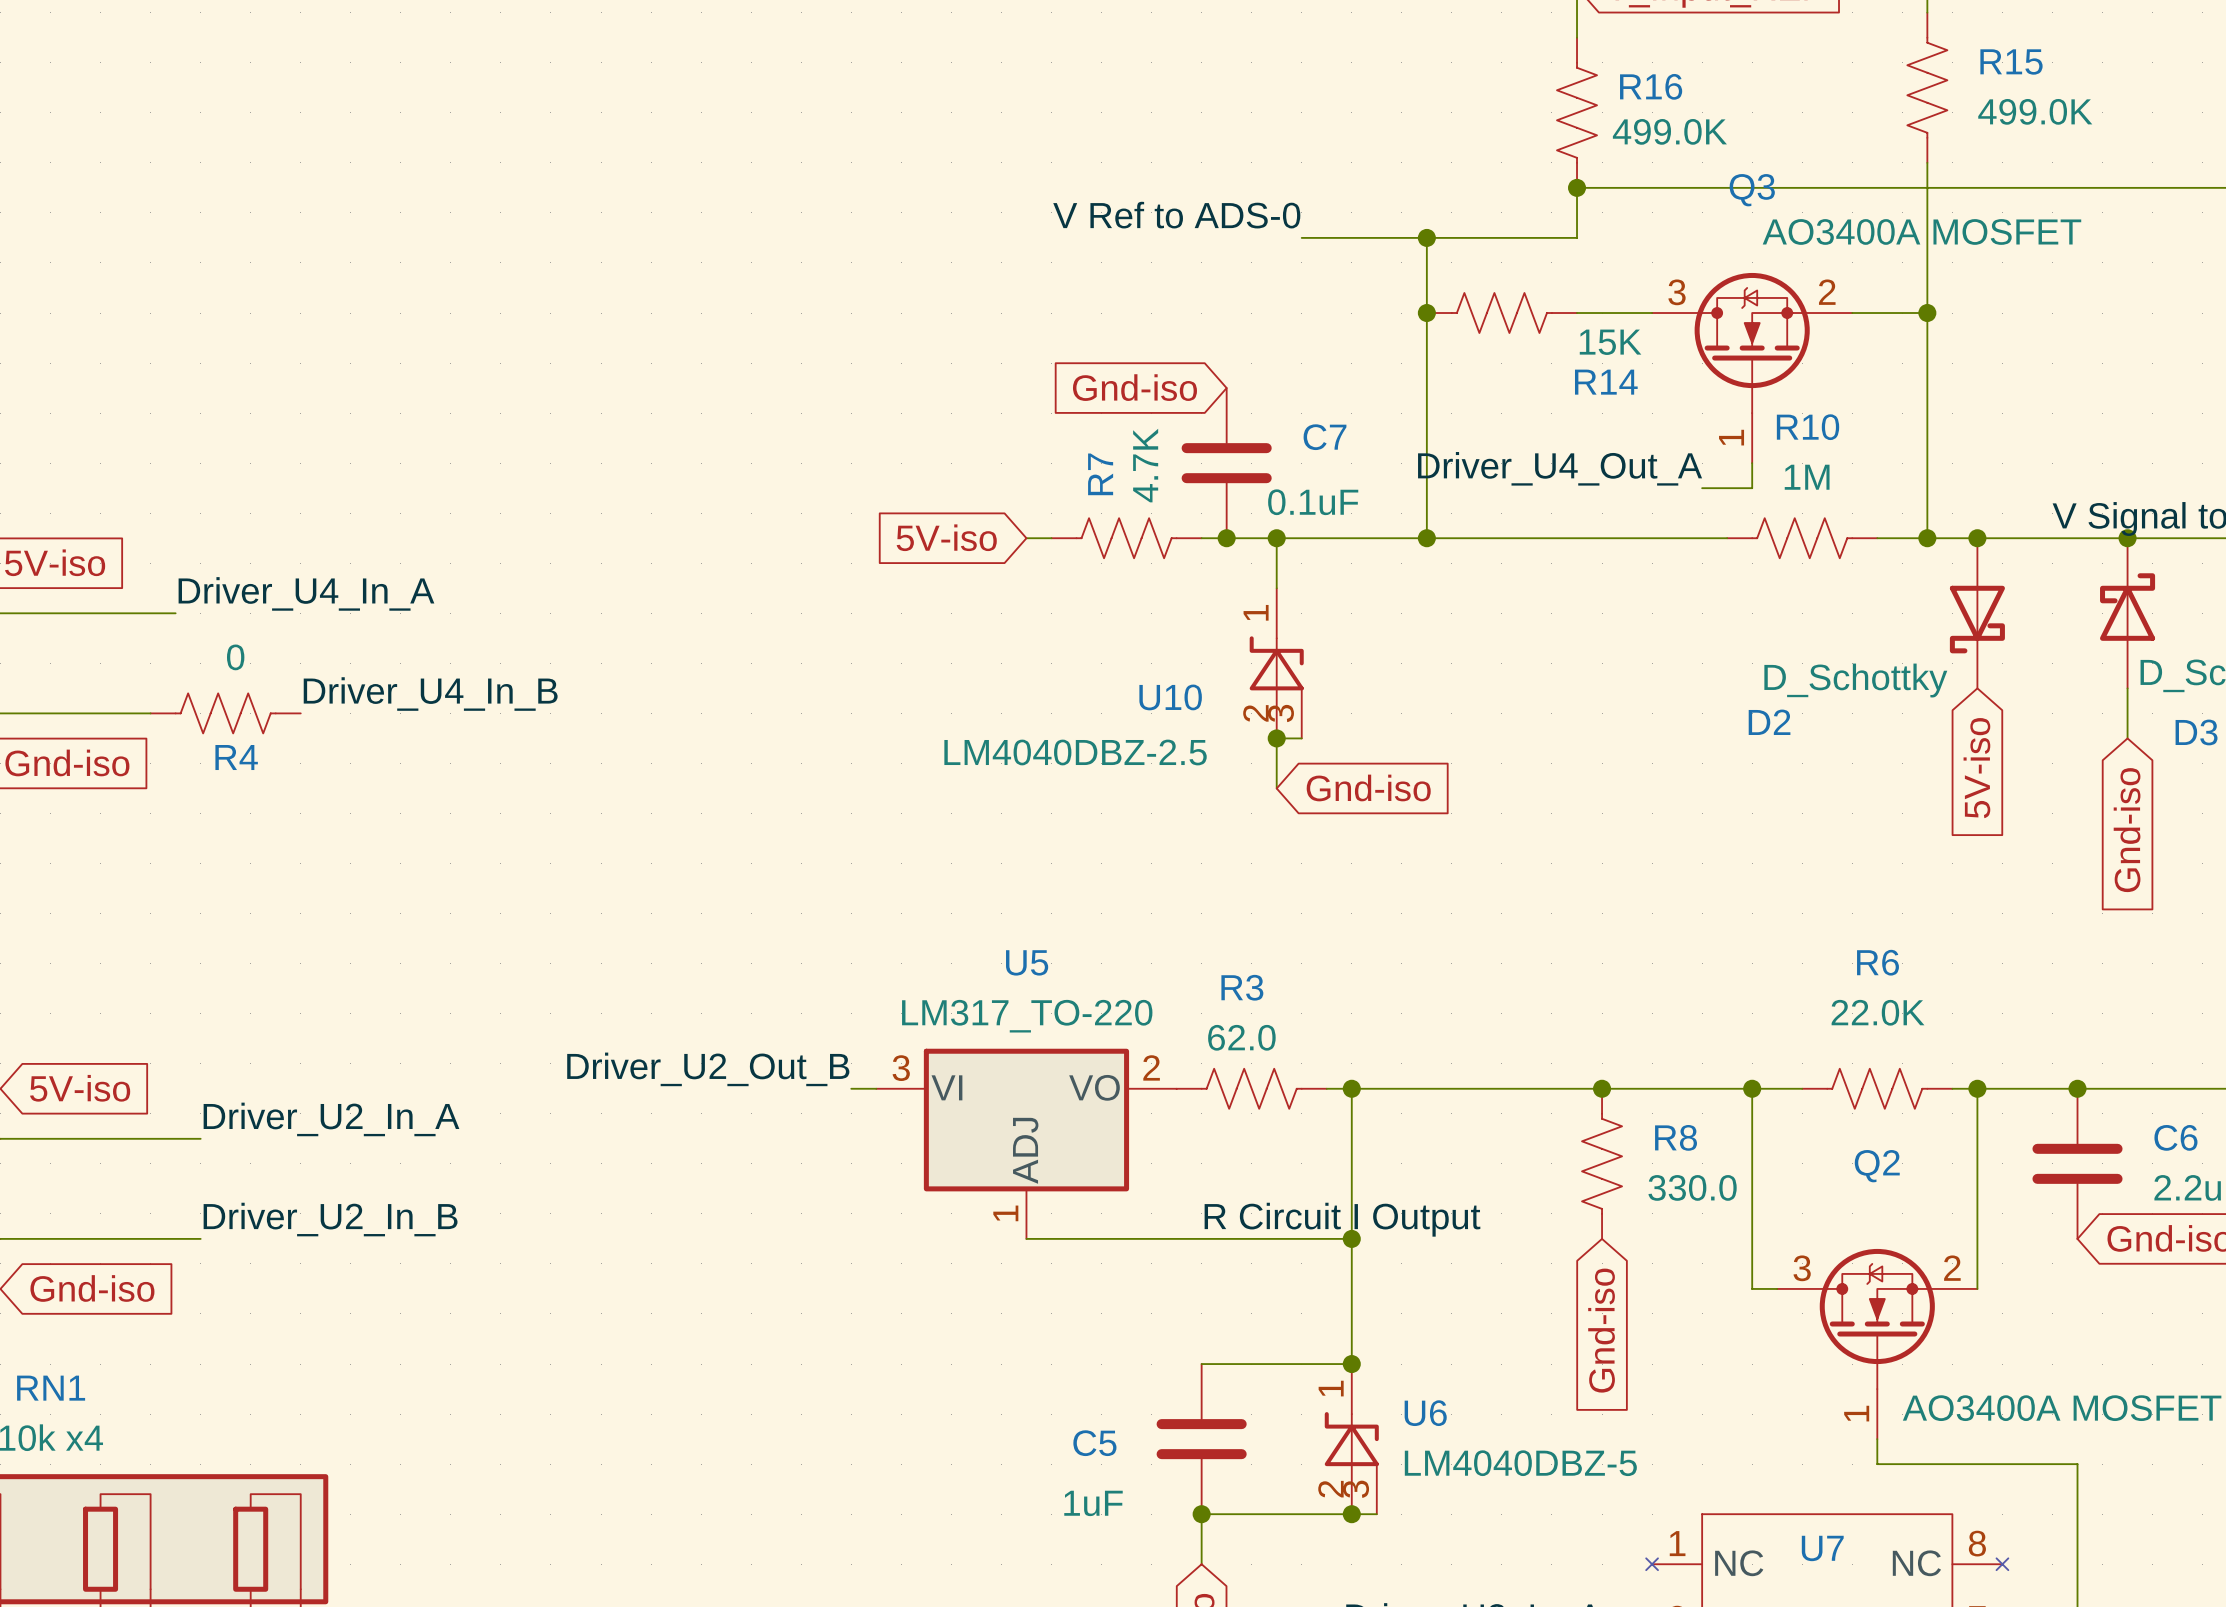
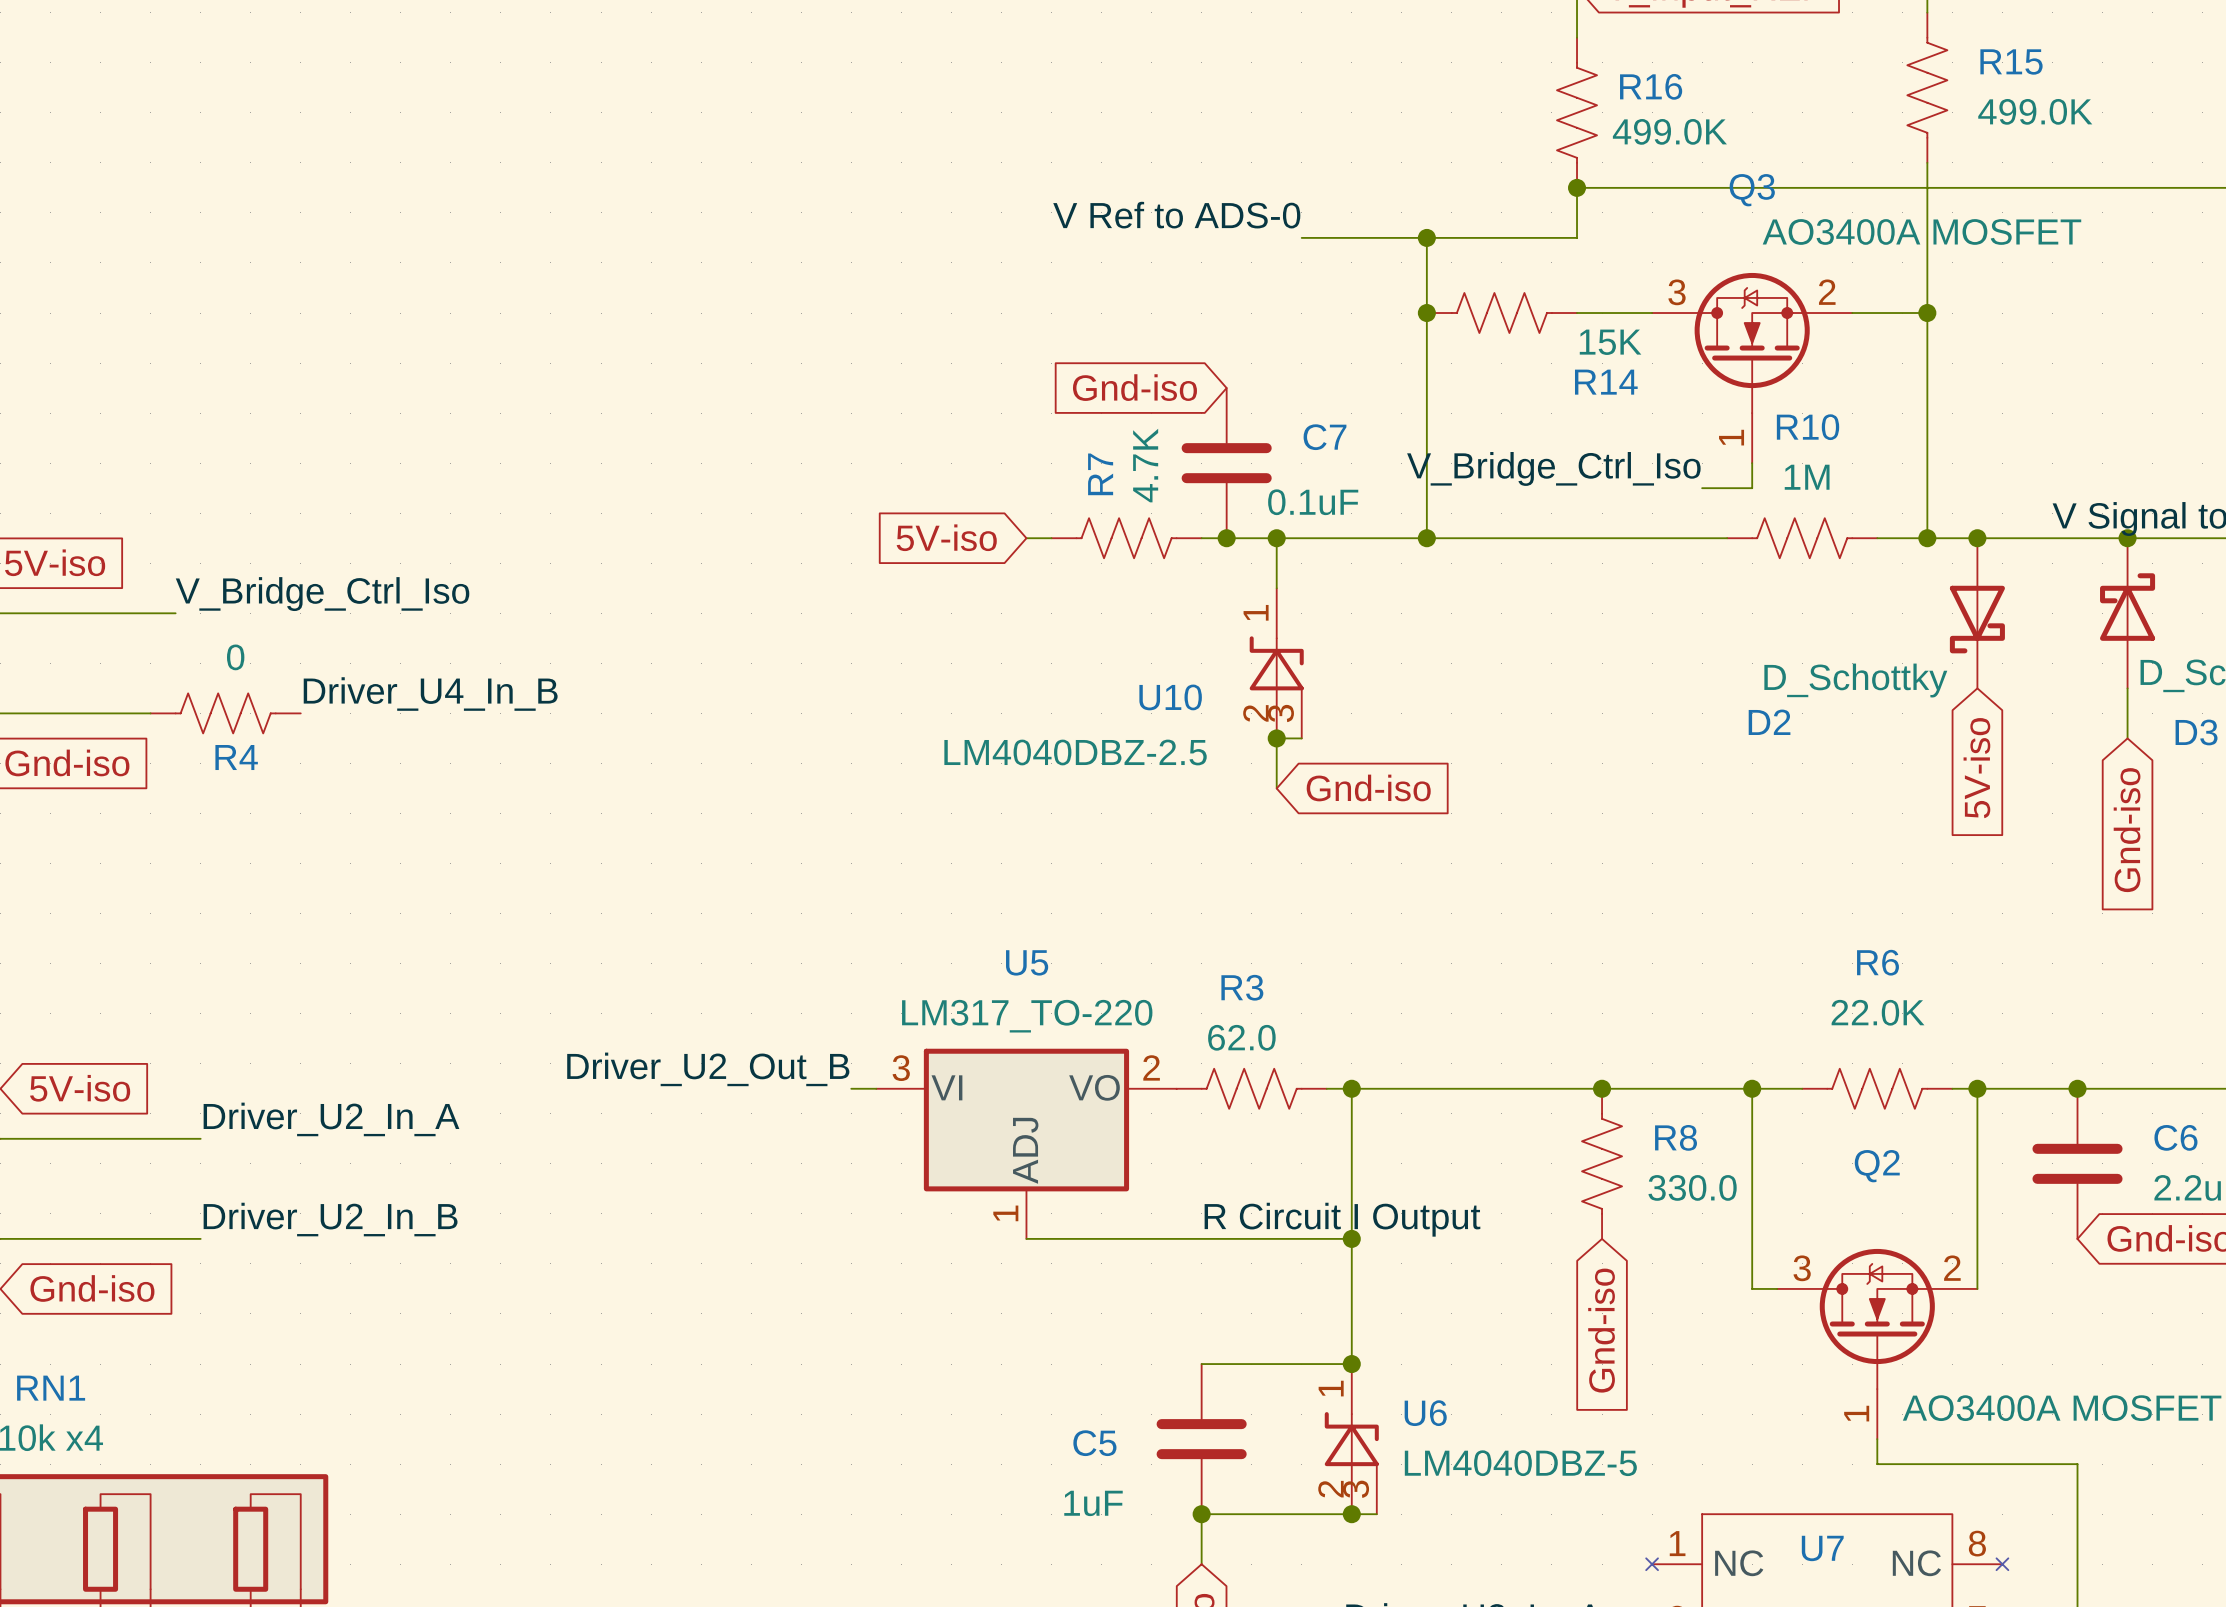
label: Driver_U4_Out_A (1560, 468) -> V_Bridge_Ctrl_Iso (1553, 468)
label: Driver_U4_In_A (306, 593) -> V_Bridge_Ctrl_Iso (322, 594)

